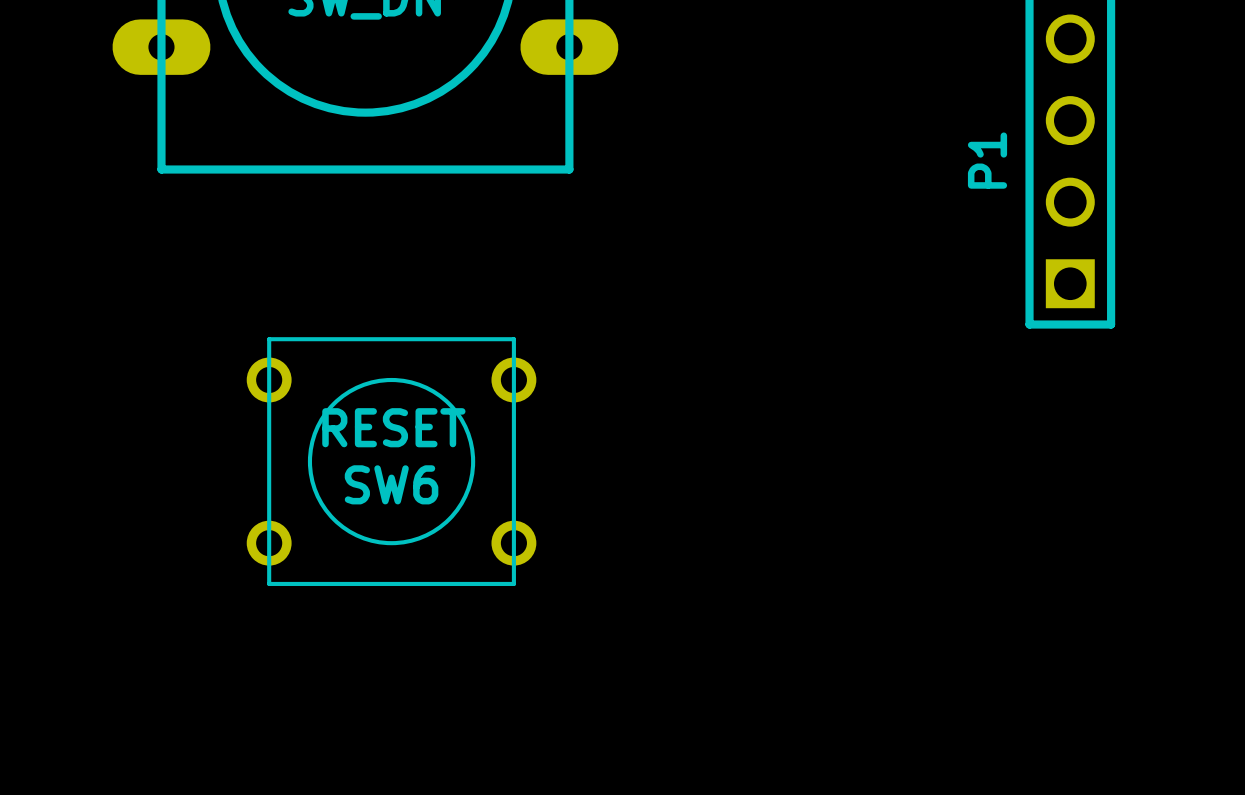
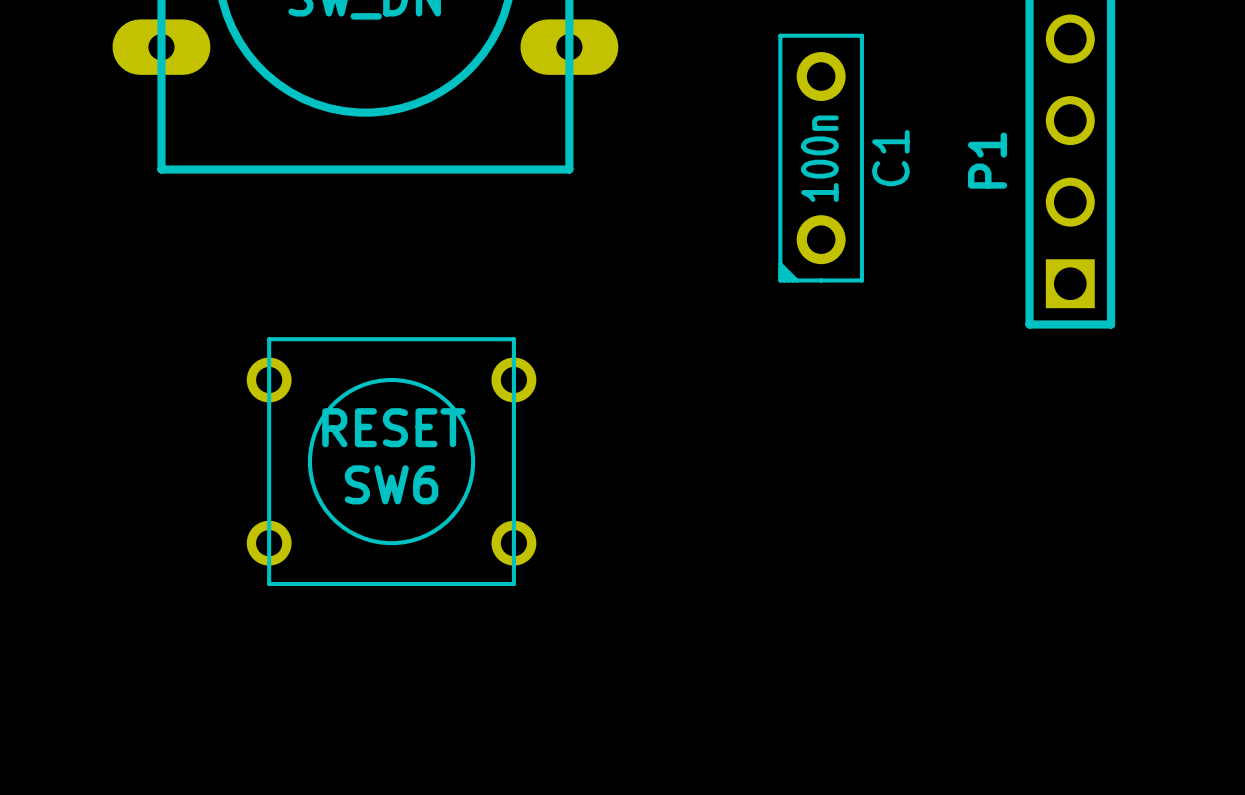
C1: none -> 100n (821, 158)

